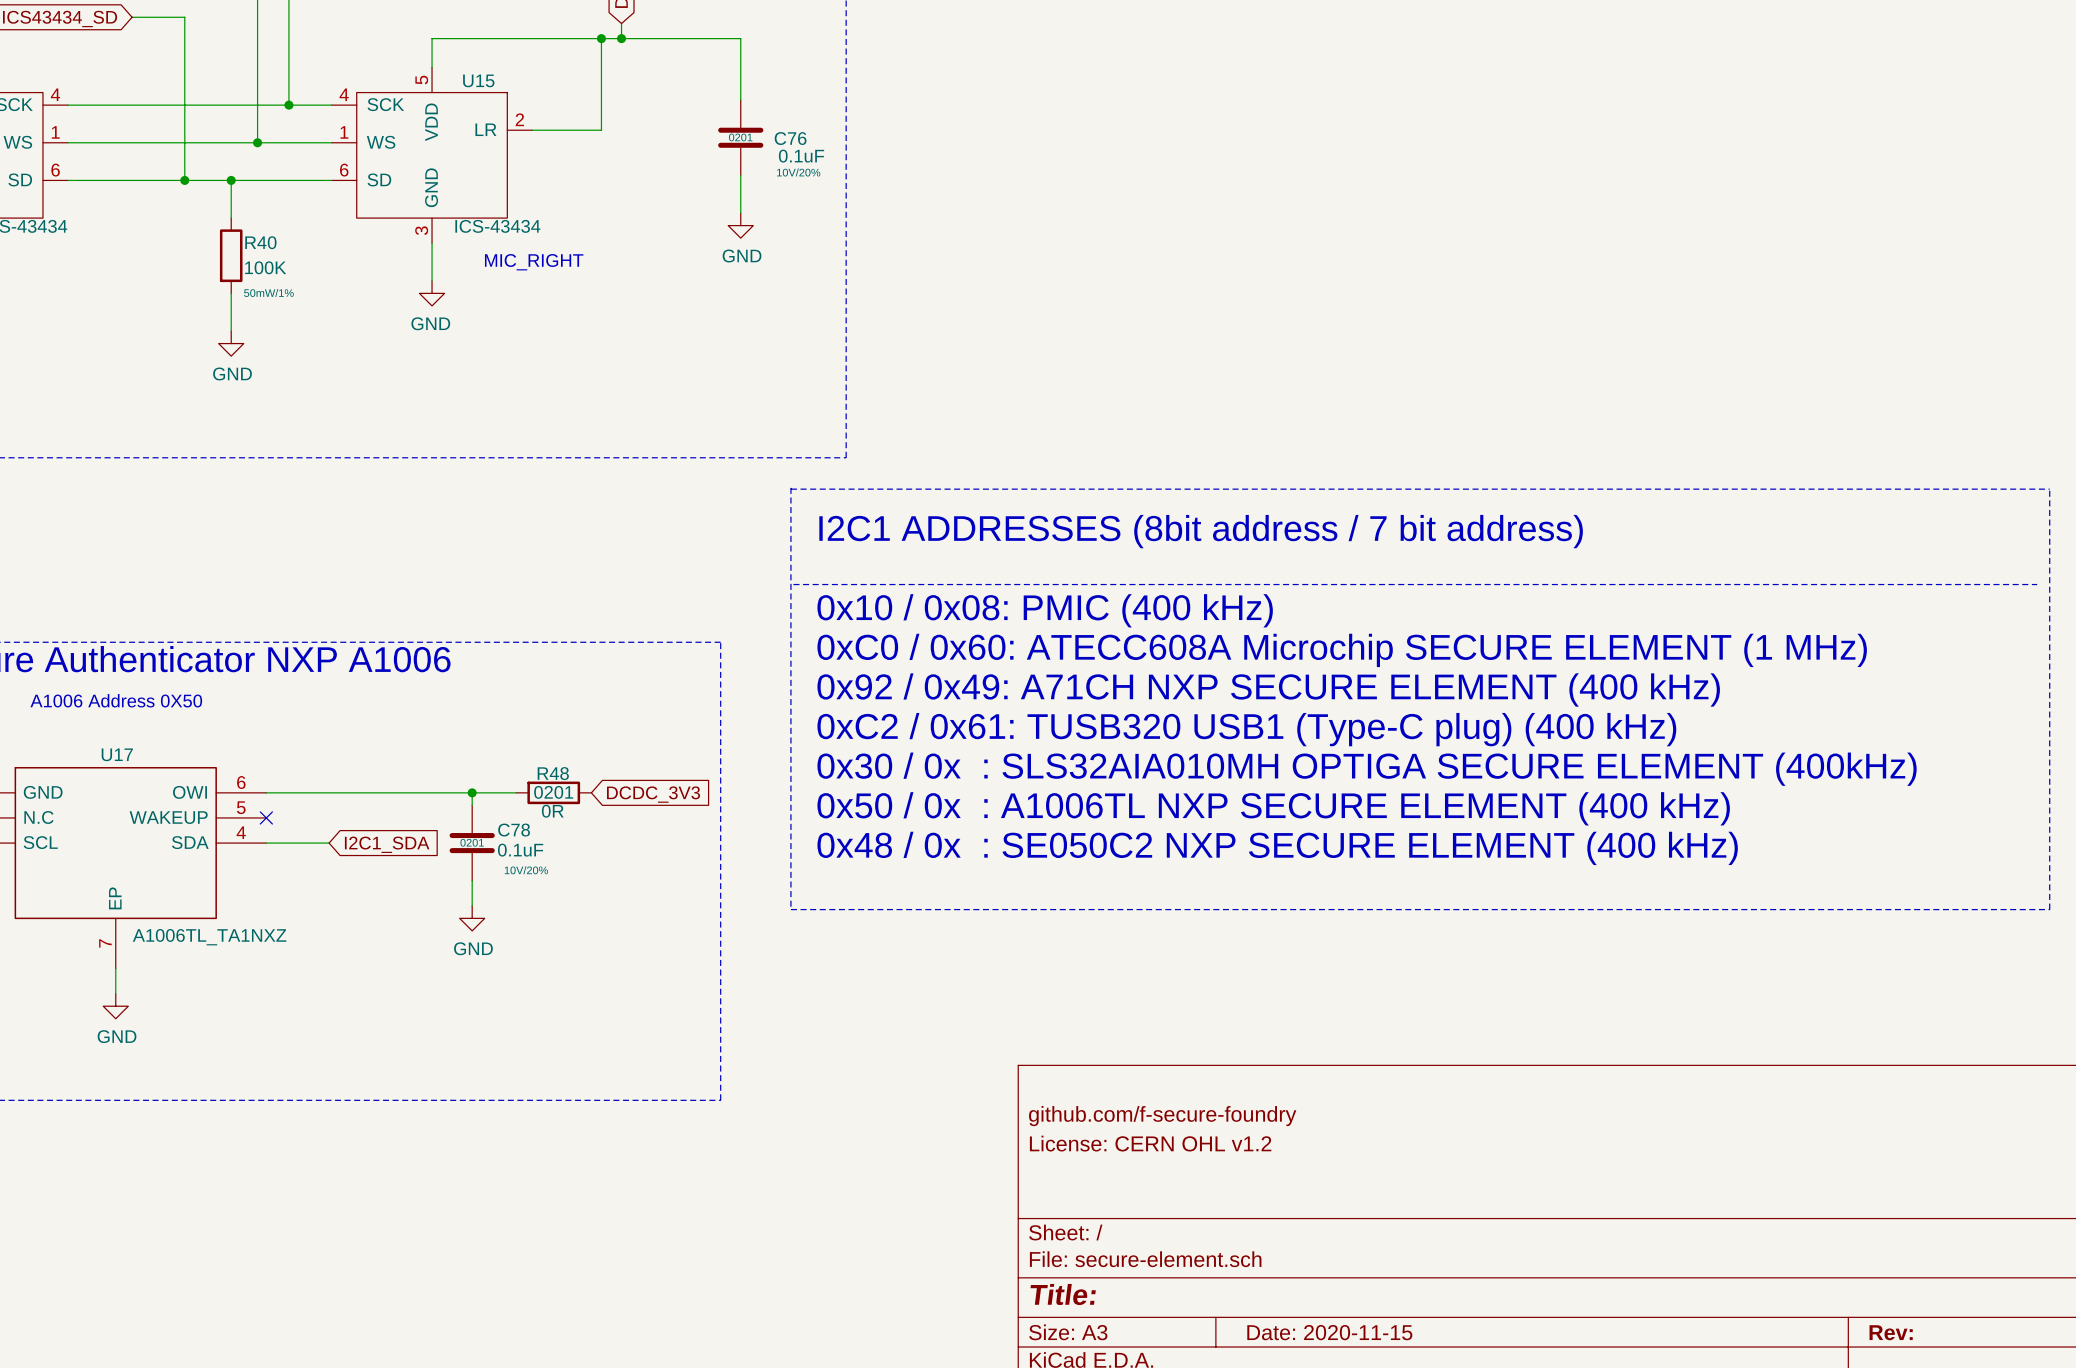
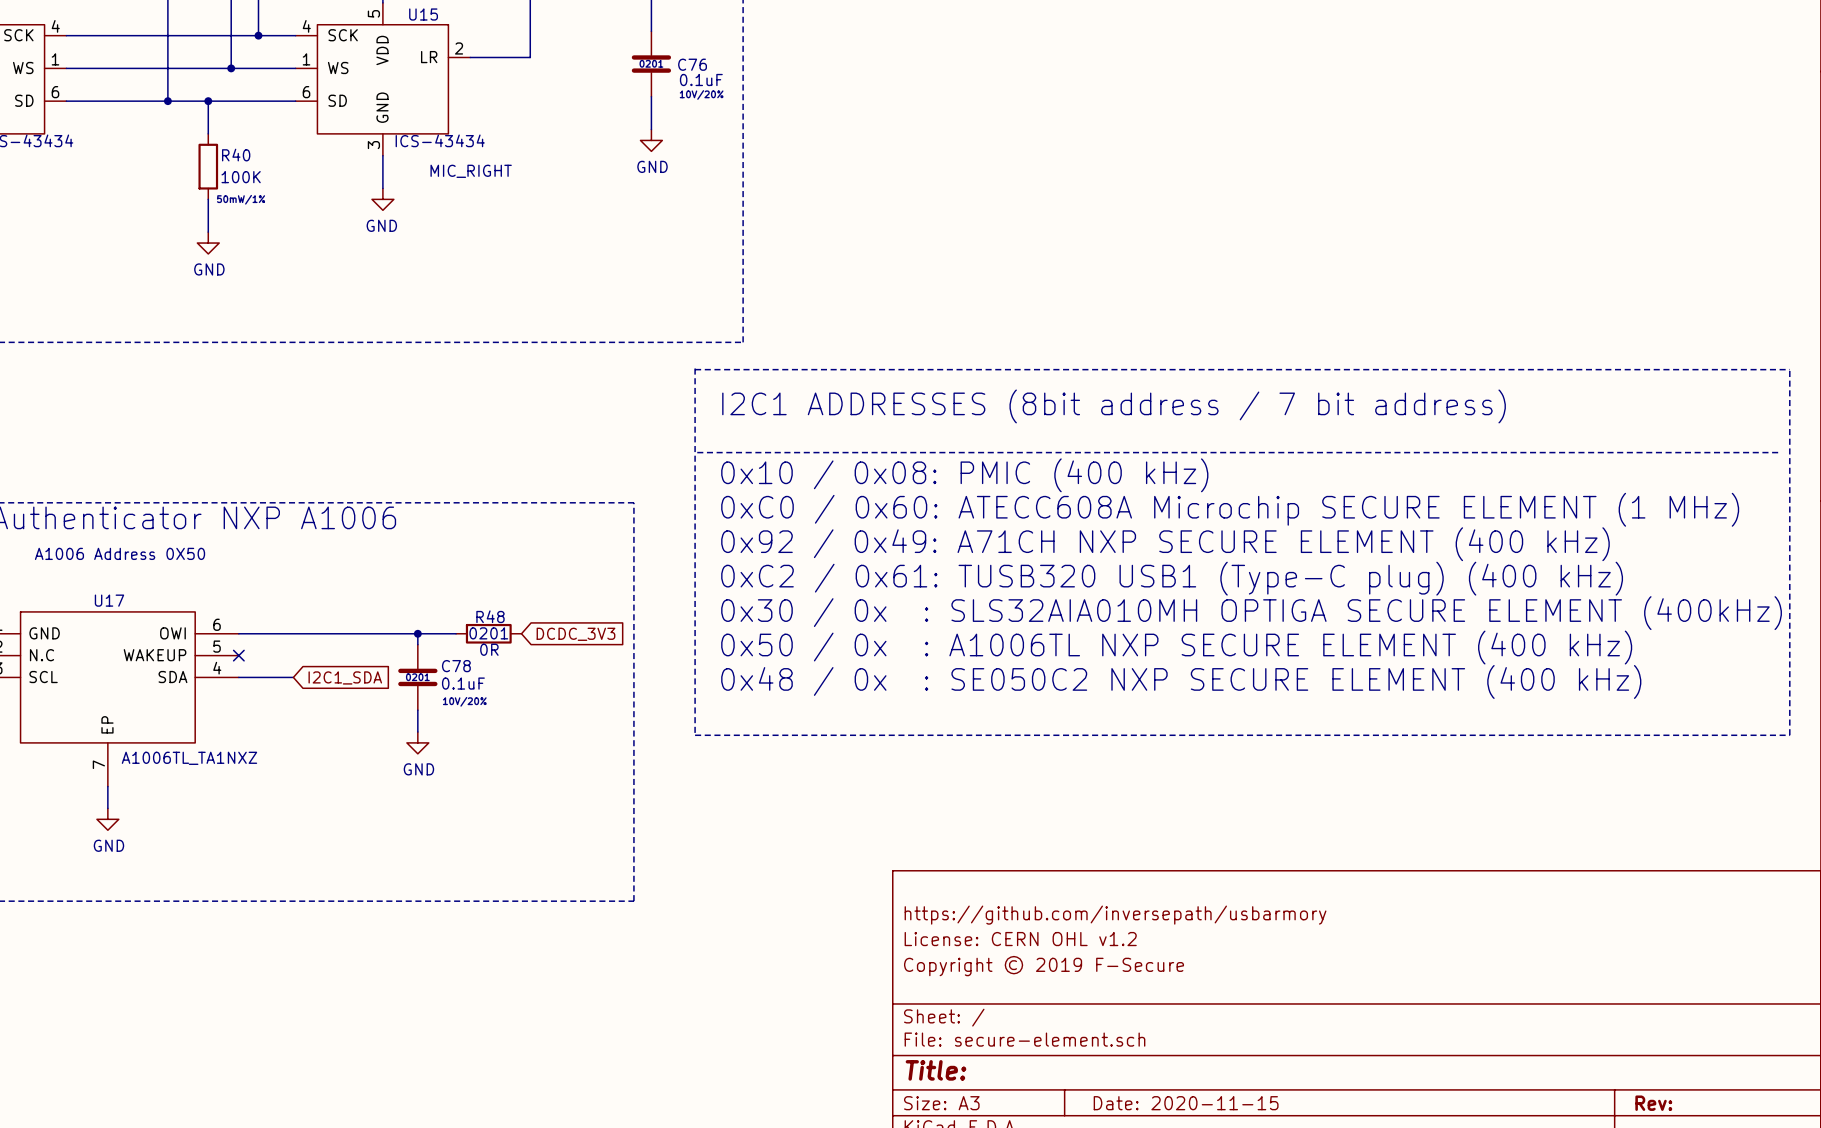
title block: github.com/f-secure-foundry (1162, 1116) -> https://github.com/inversepath/usbarmory (1115, 915)
title block: none -> Copyright © 2019 F-Secure (1044, 966)

